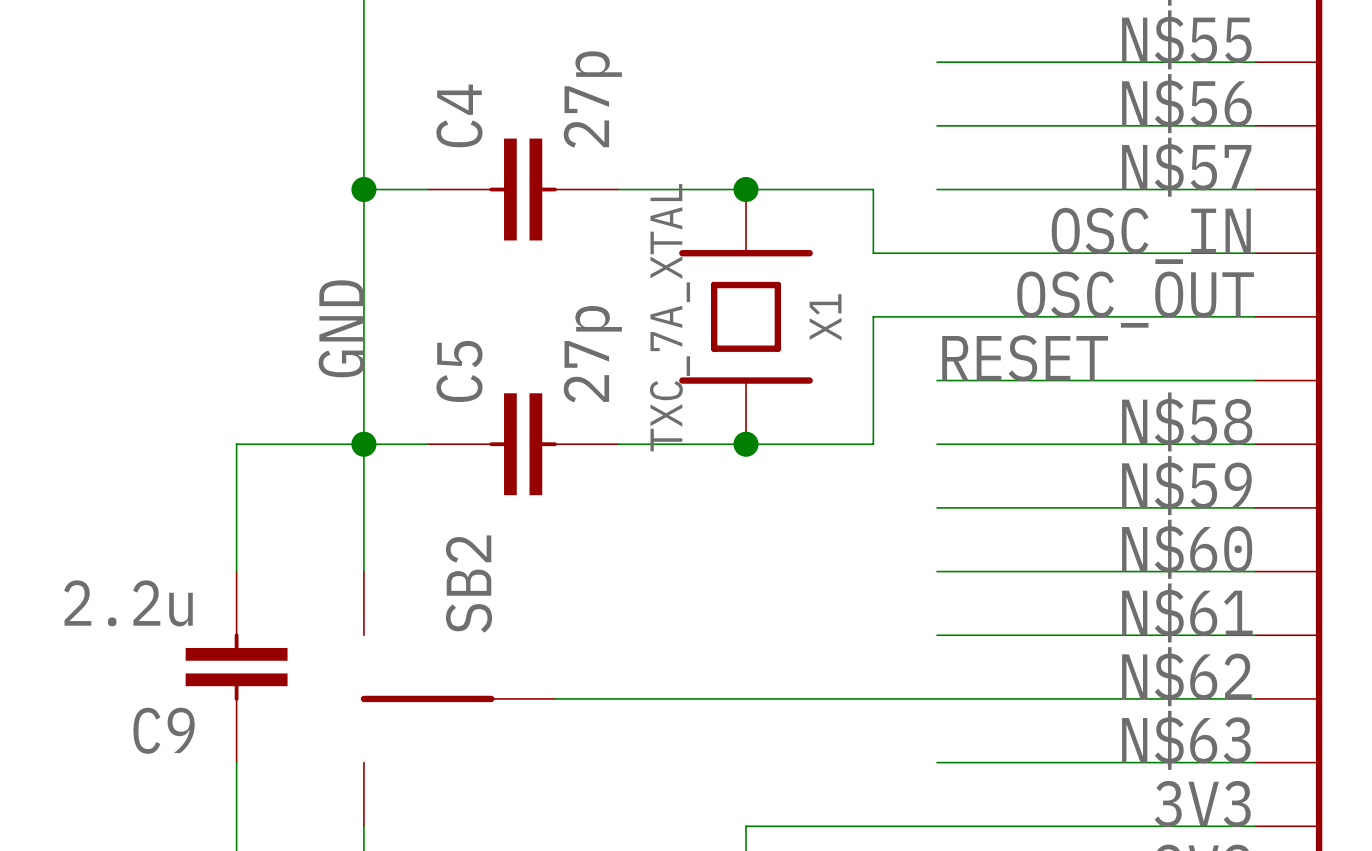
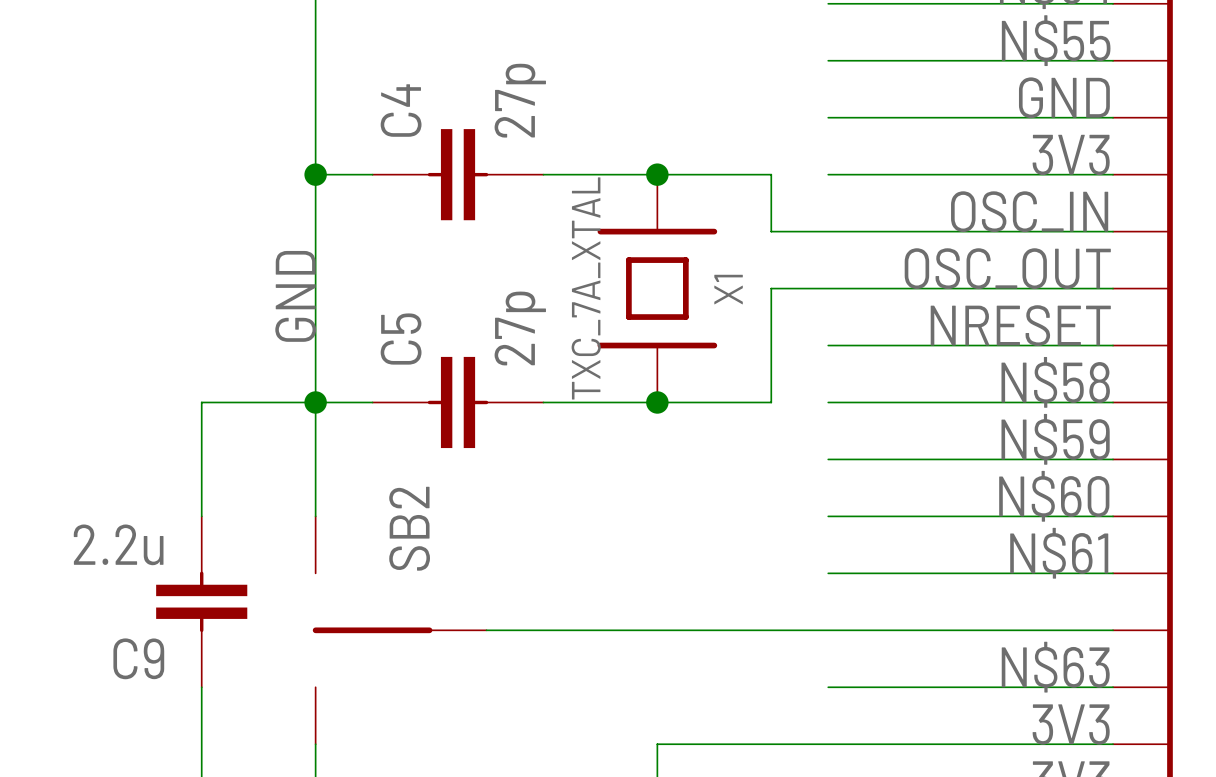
label: N$56 (1186, 103) -> GND (1064, 97)
label: N$57 (1186, 167) -> 3V3 (1071, 154)
label: RESET (1025, 358) -> NRESET (1020, 325)
label: N$62 (1186, 676) -> none

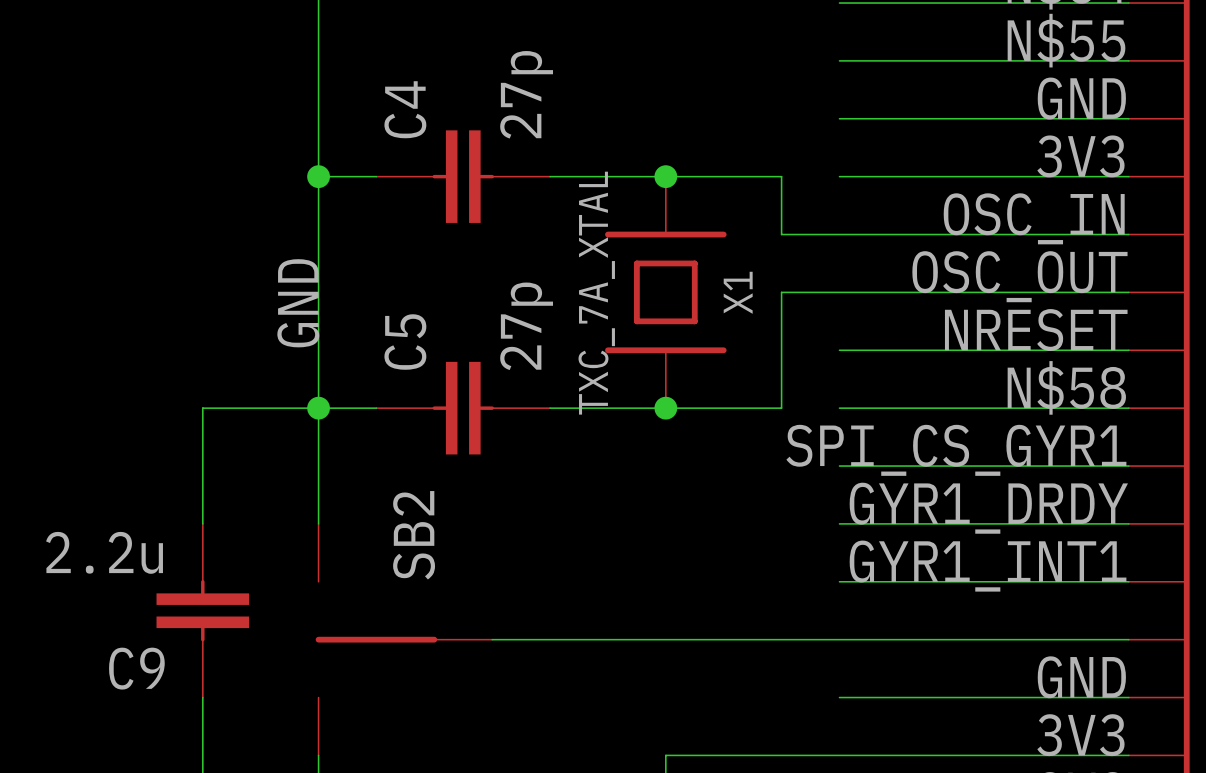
label: N$59 (1055, 439) -> SPI_CS_GYR1 (956, 450)
label: N$60 (1054, 496) -> GYR1_DRDY (988, 508)
label: N$61 (1059, 553) -> GYR1_INT1 (988, 566)
label: N$63 (1055, 667) -> GND (1081, 677)

